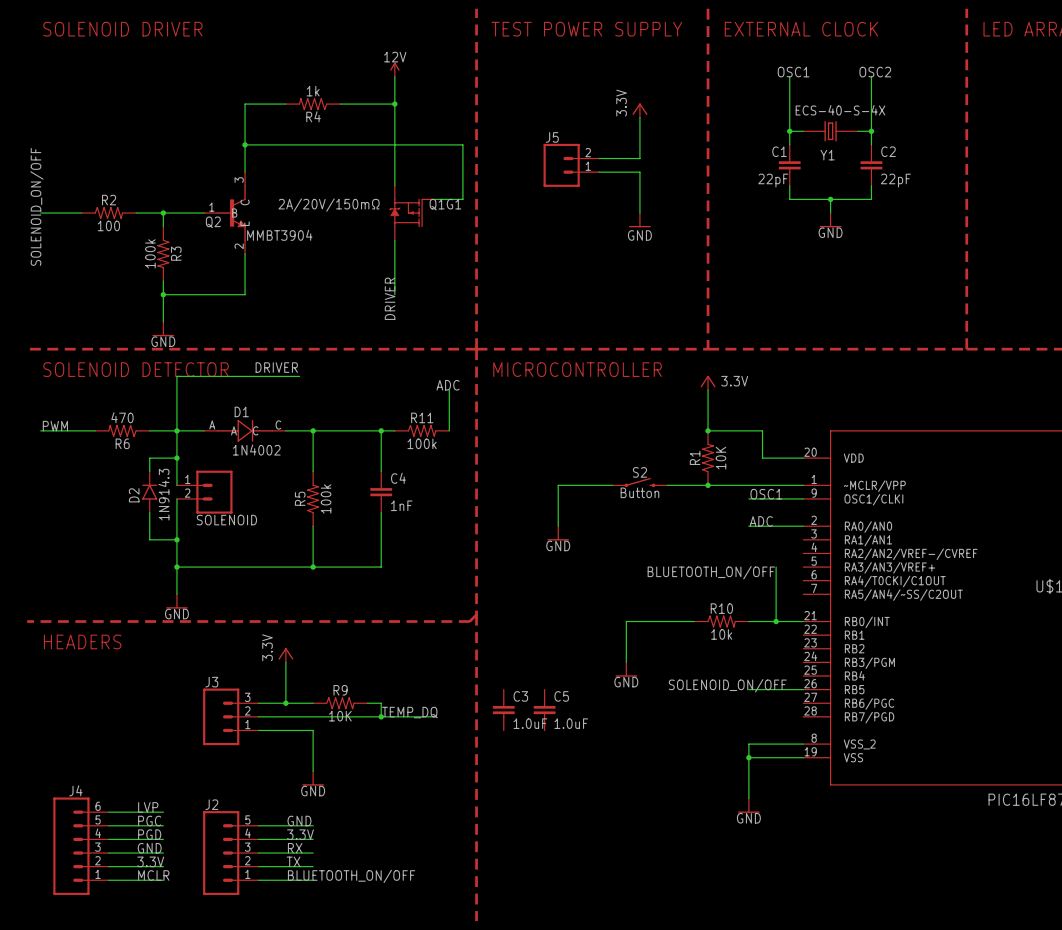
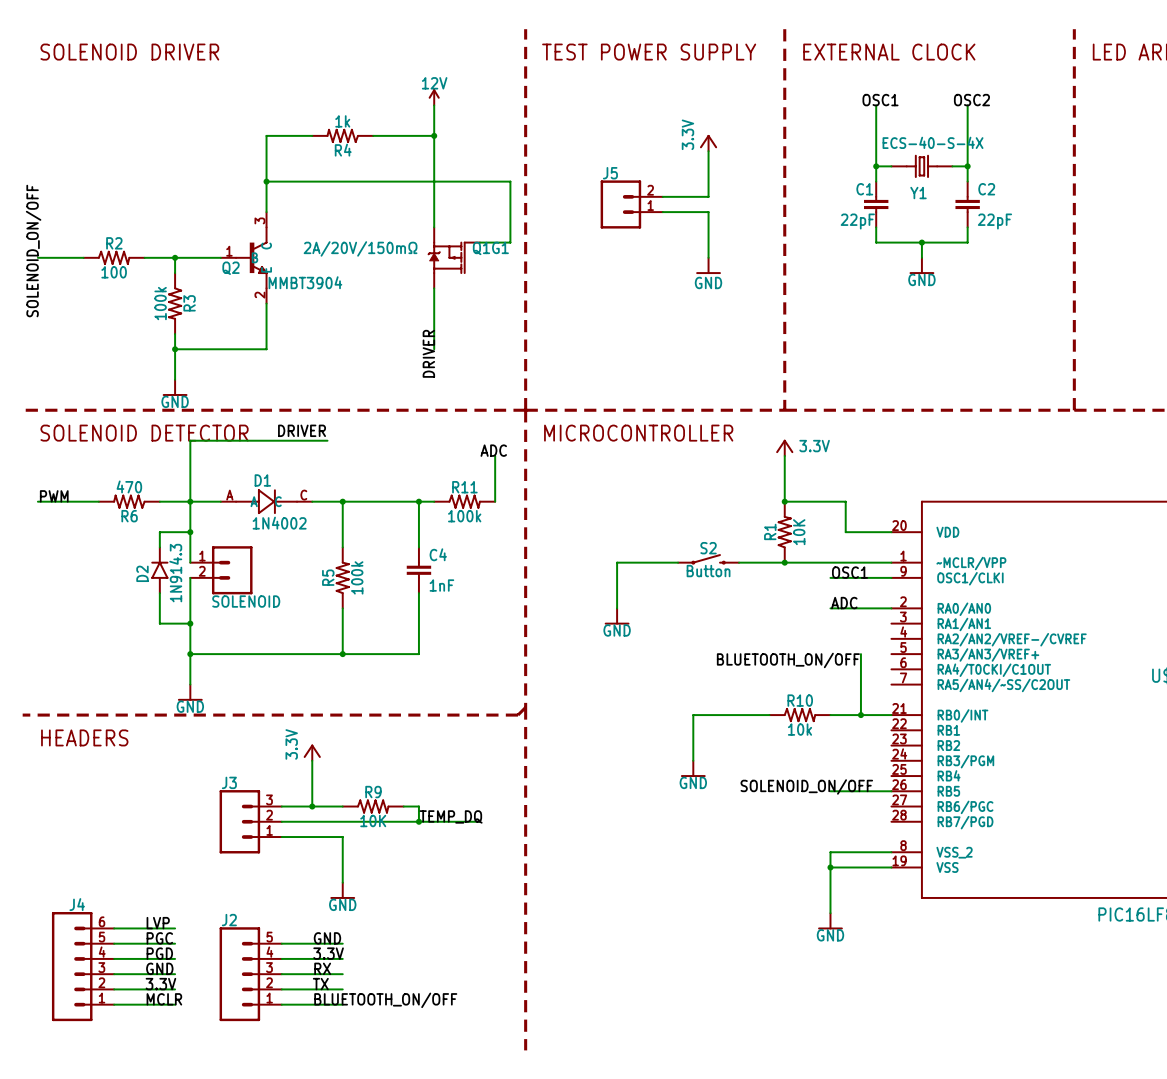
C3: 1.0uF (503, 710) -> none
C5: 1.0uF (544, 710) -> none

